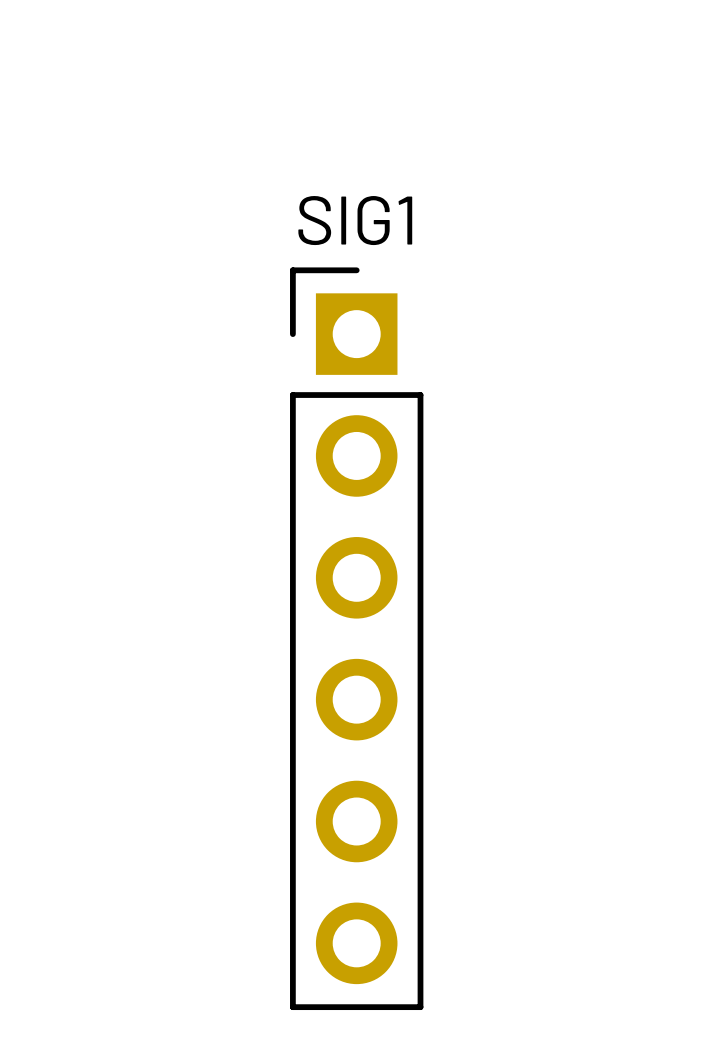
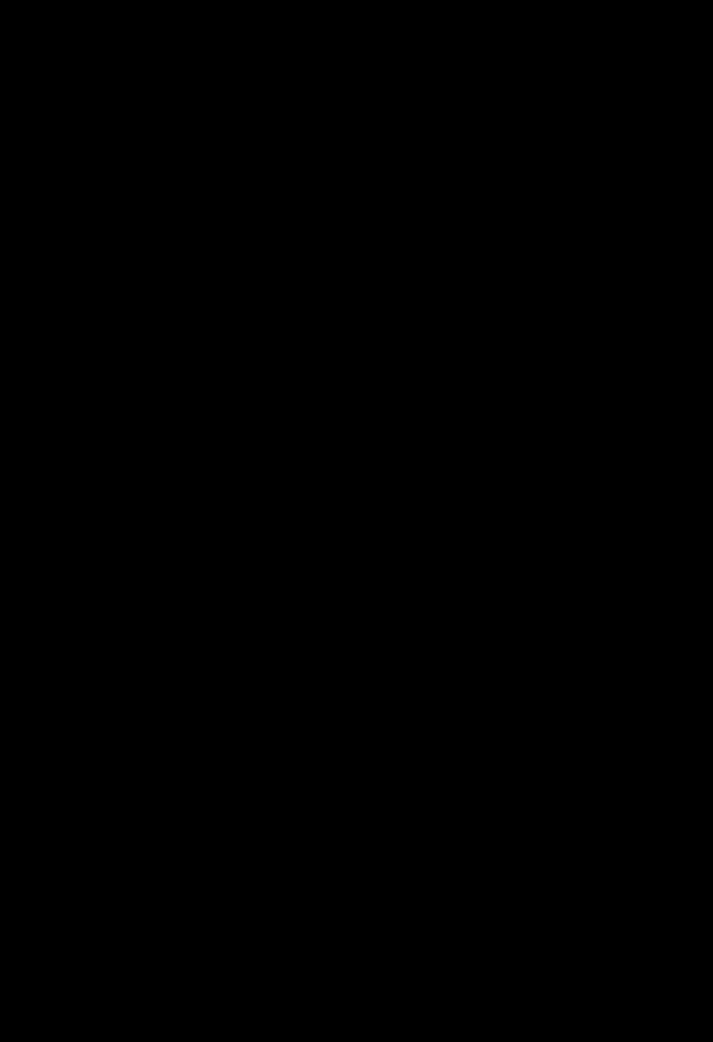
SIG1: (356, 638) -> none

